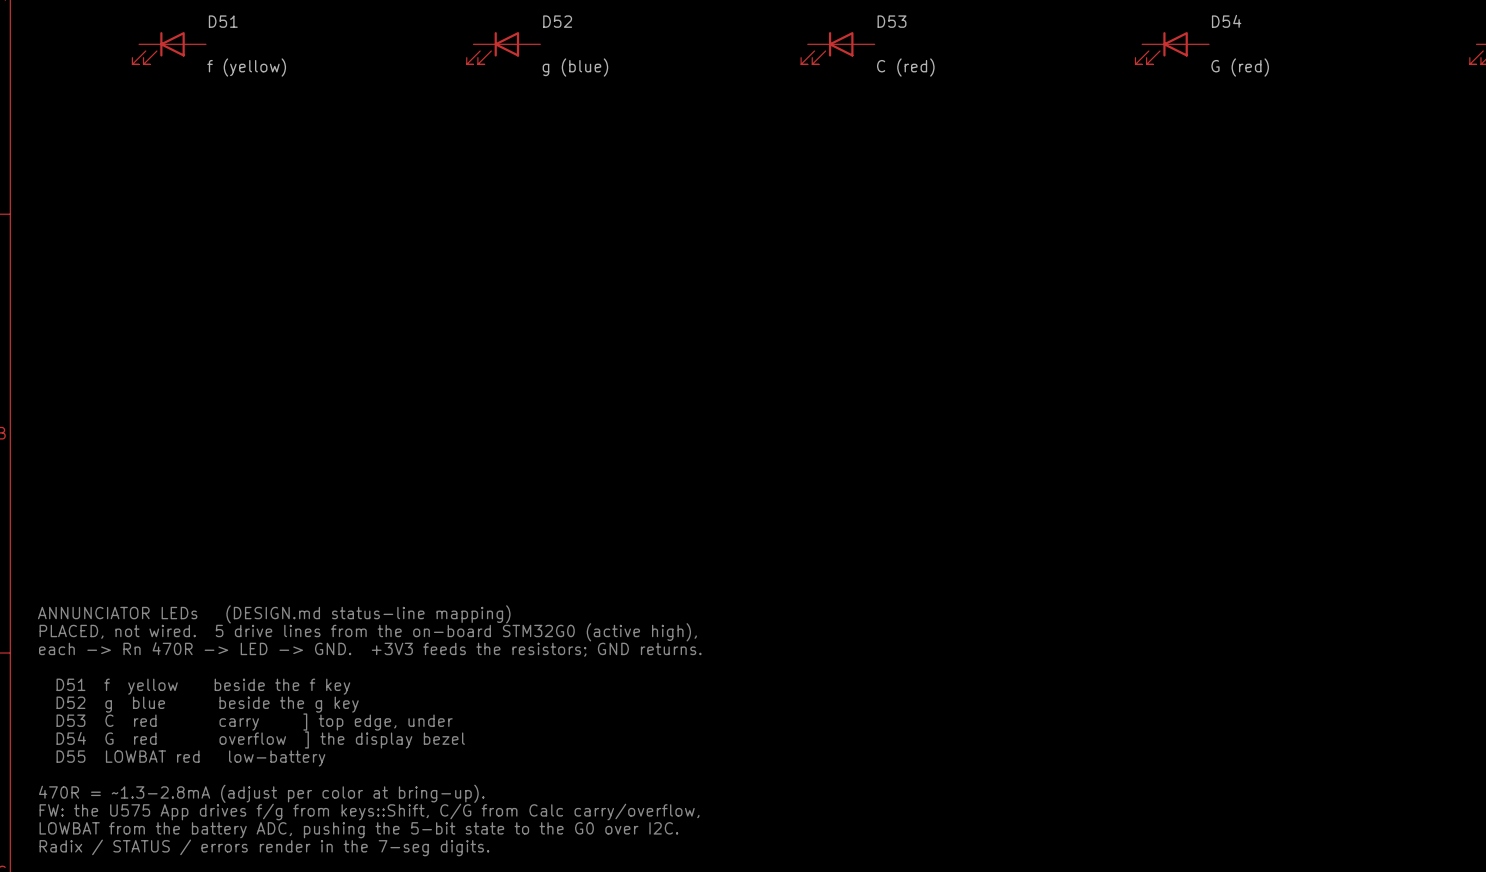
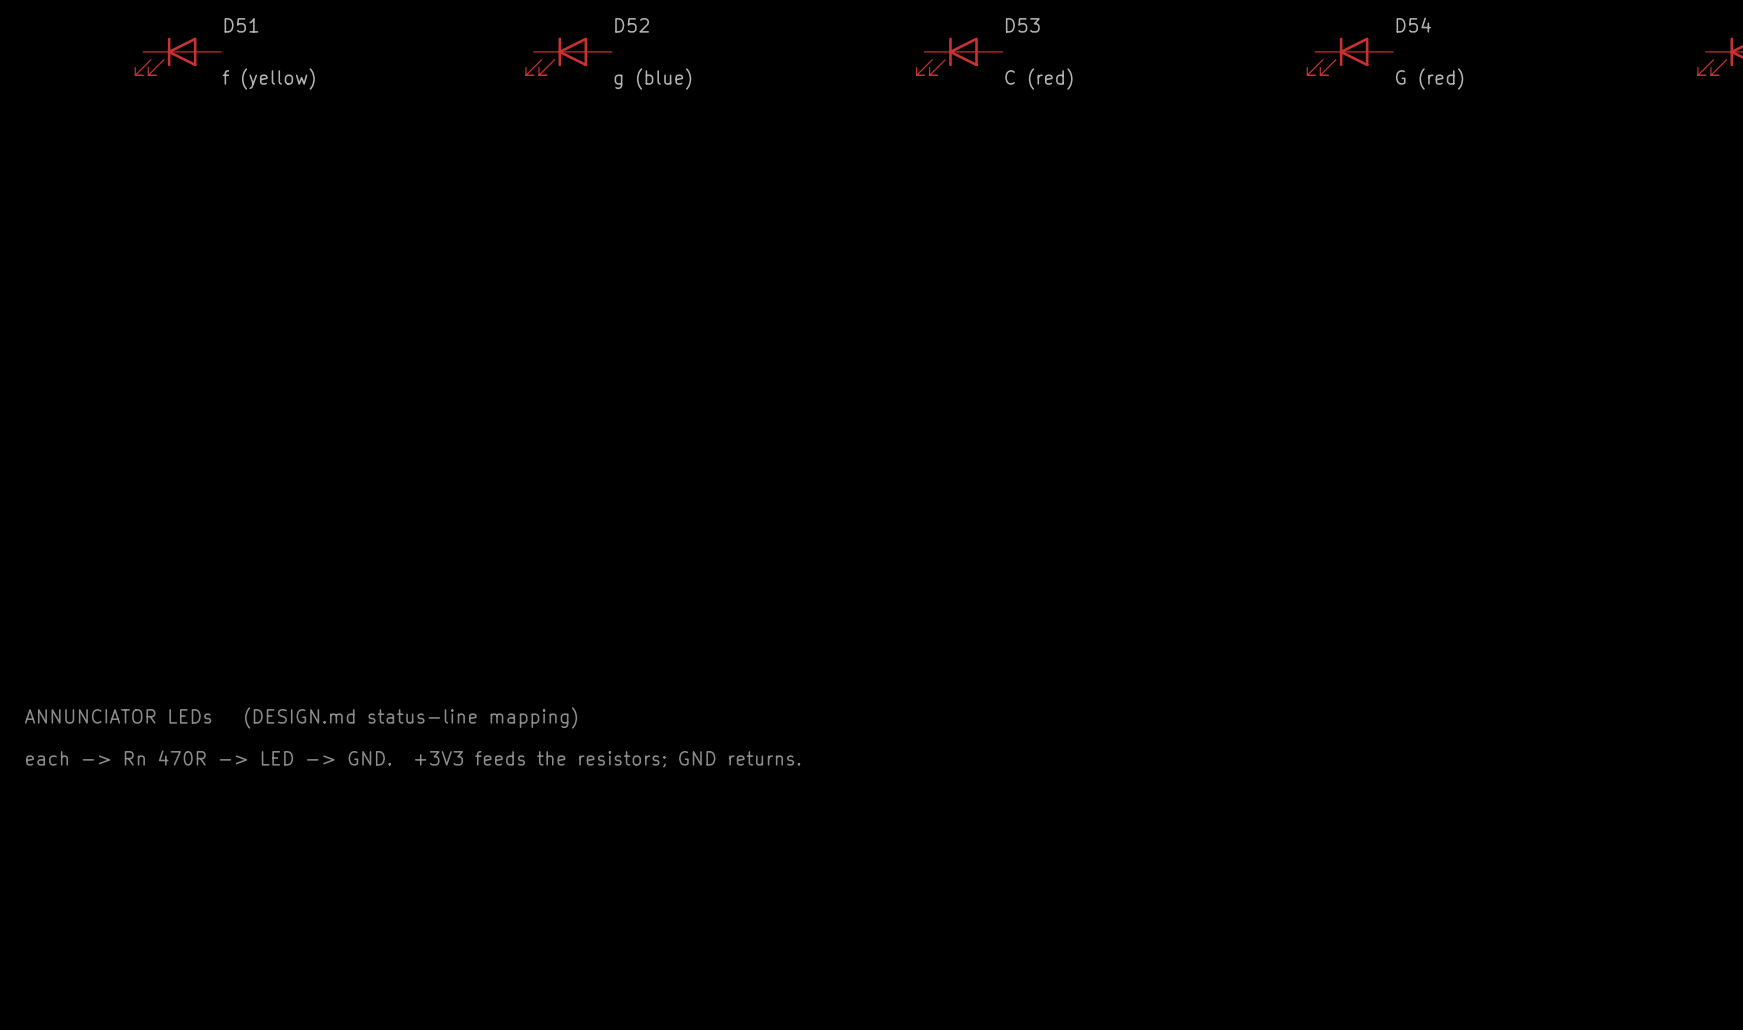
text: PLACED, not wired. 5 drive lines from the on-board STM32G0 (active high), (368, 632) -> none
text: D51 f yellow beside the f key (203, 686) -> none
text: D52 g blue beside the g key (207, 704) -> none
text: D53 C red carry ] top edge, under (254, 722) -> none
text: D54 G red overflow ] the display bezel (260, 739) -> none
text: D55 LOWBAT red low-battery (190, 758) -> none
text: 470R = ~1.3-2.8mA (adjust per color at bring-up). (261, 793) -> none
text: FW: the U575 App drives f/g from keys::Shift, C/G from Calc carry/overflow, (369, 812) -> none
text: LOWBAT from the battery ADC, pushing the 5-bit state to the G0 over I2C. (358, 830) -> none
text: Radix / STATUS / errors render in the 7-seg digits. (264, 847) -> none

